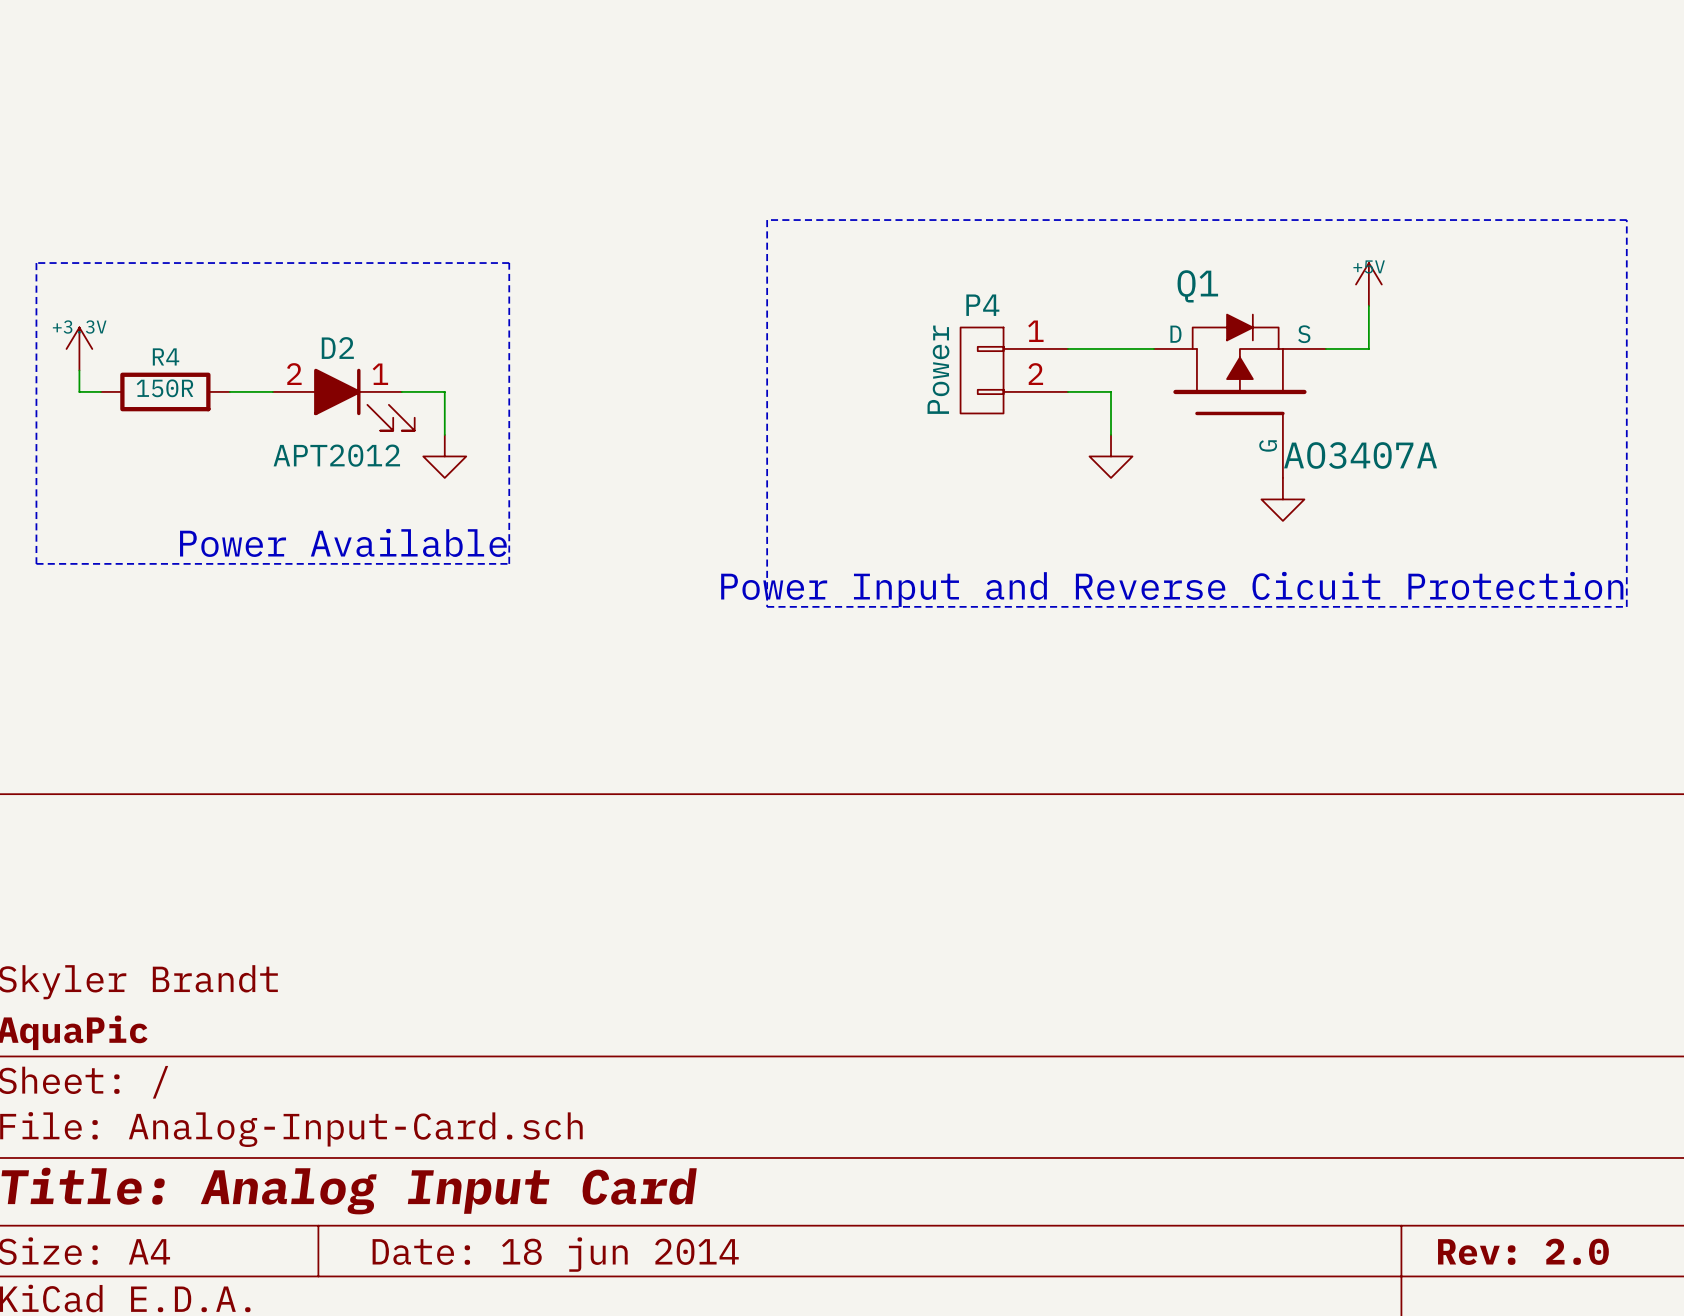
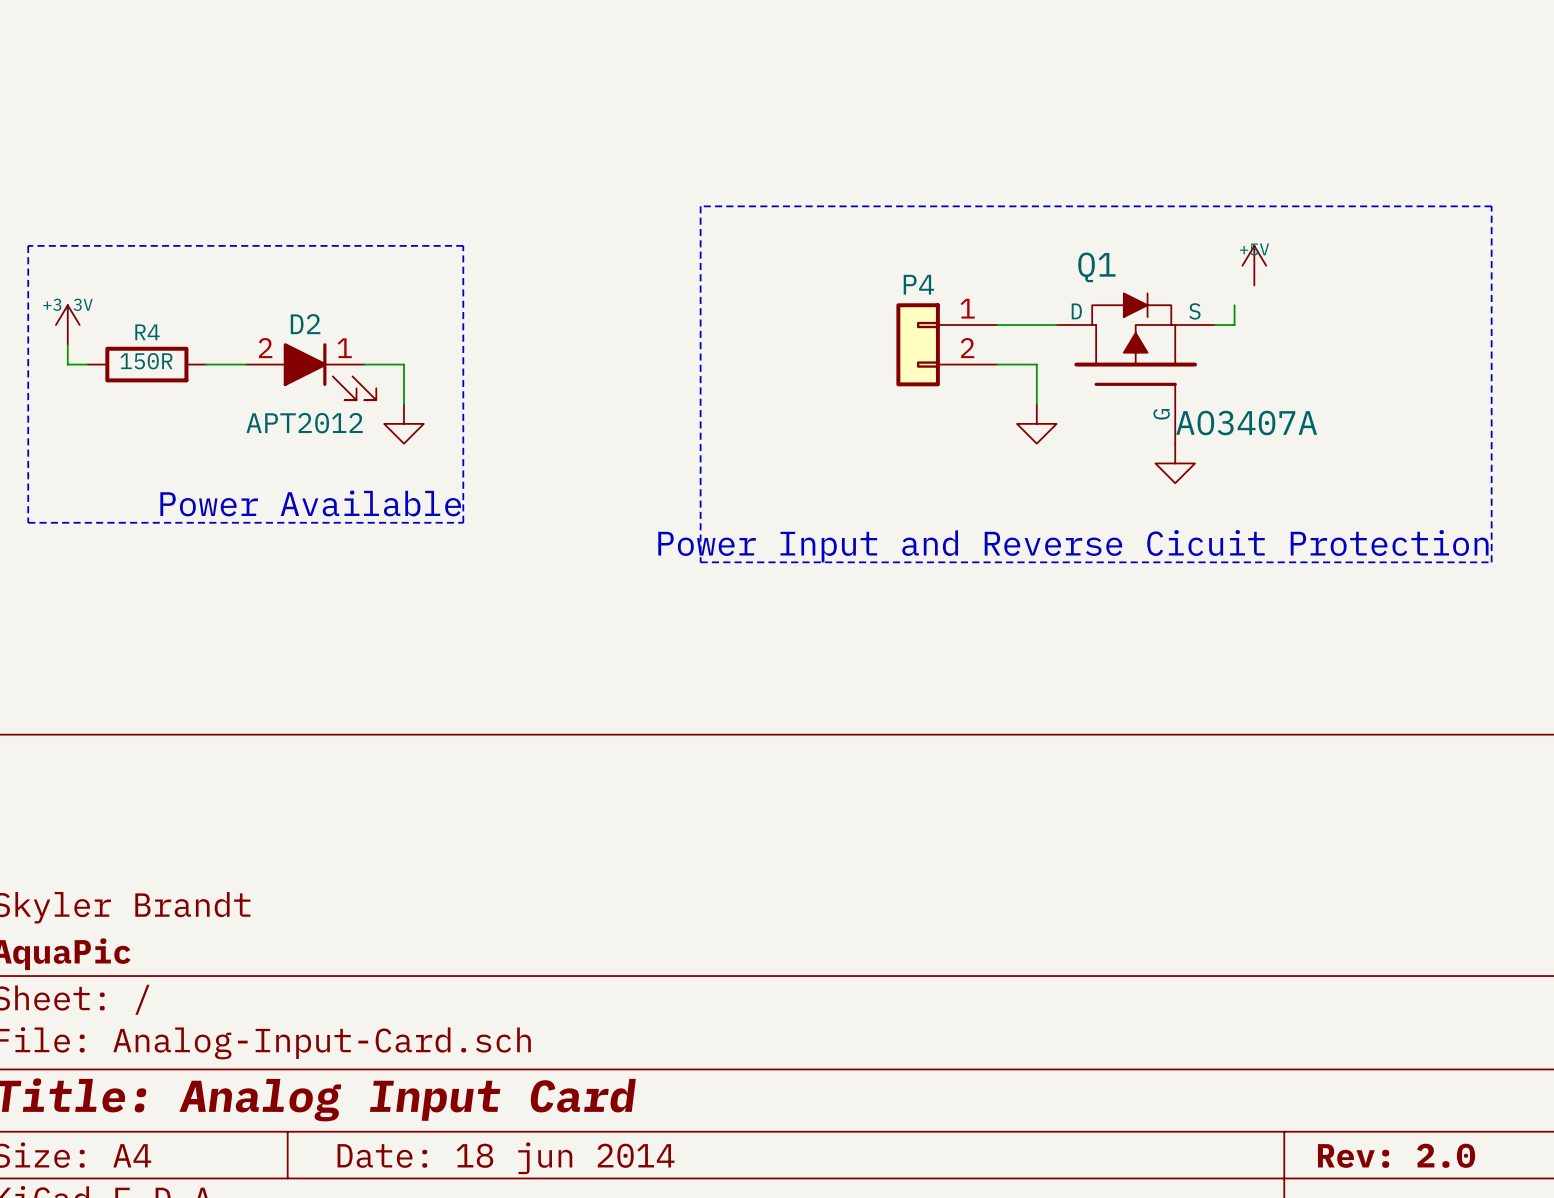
wire: (1368, 306) (1368, 348) (1347, 348) -> (1234, 305) (1234, 325)
P4 symbol: [960, 327, 1069, 414] -> [896, 303, 998, 387]
P4 value: Power (938, 369) -> none
wire: (1111, 391) (1111, 434) -> (1017, 364) (1036, 364) (1036, 404)
power symbol position: (1111, 456) -> (1036, 423)

